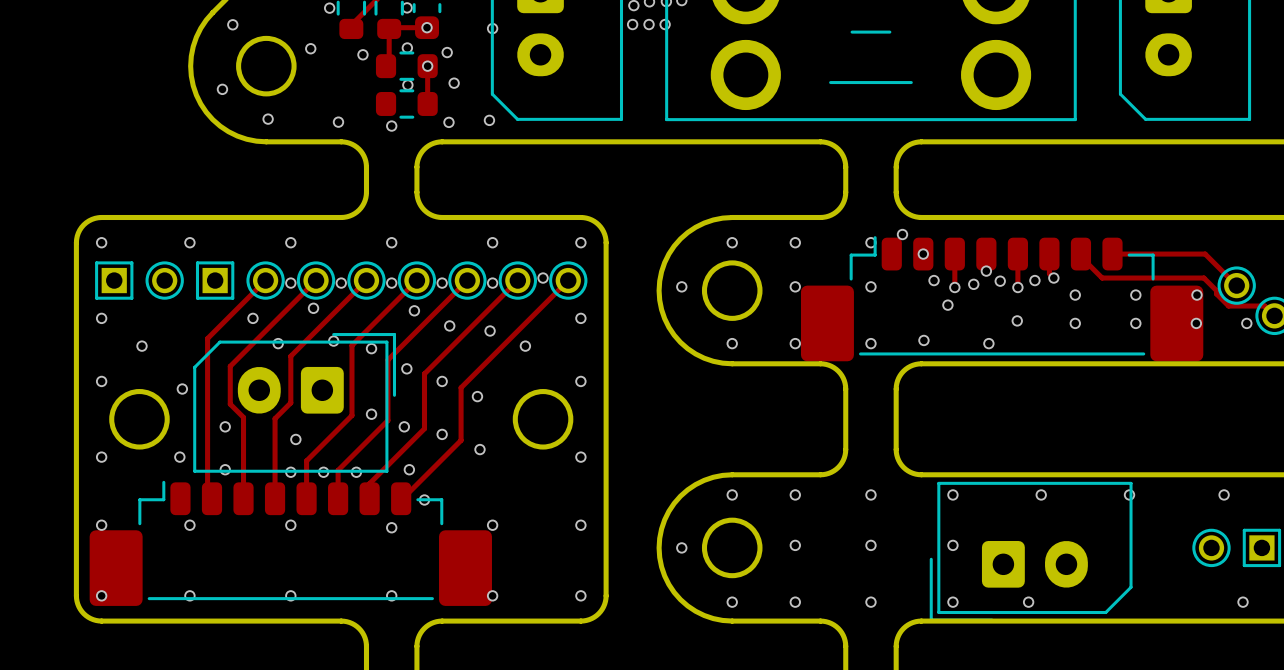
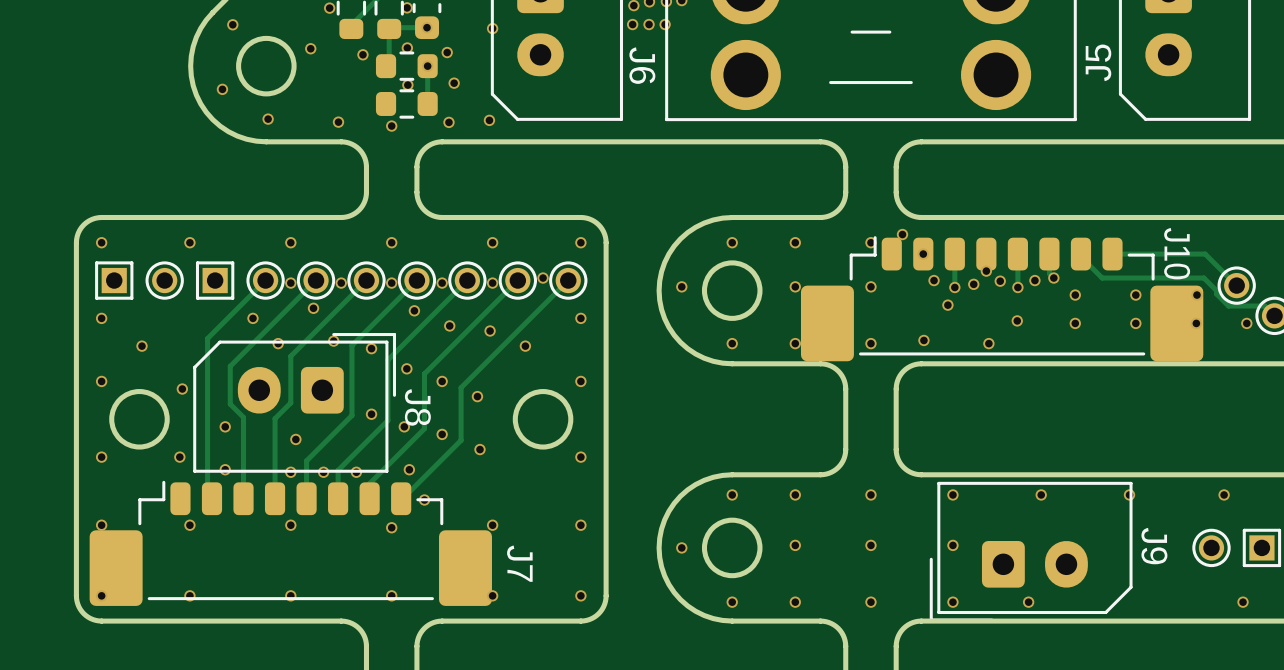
J6 name: none -> J6 (642, 65)
J5 name: none -> J5 (1098, 62)
J10 name: none -> J10 (1177, 253)
J8 name: none -> J8 (417, 407)
J9 name: none -> J9 (1154, 546)
J7 name: none -> J7 (519, 563)

